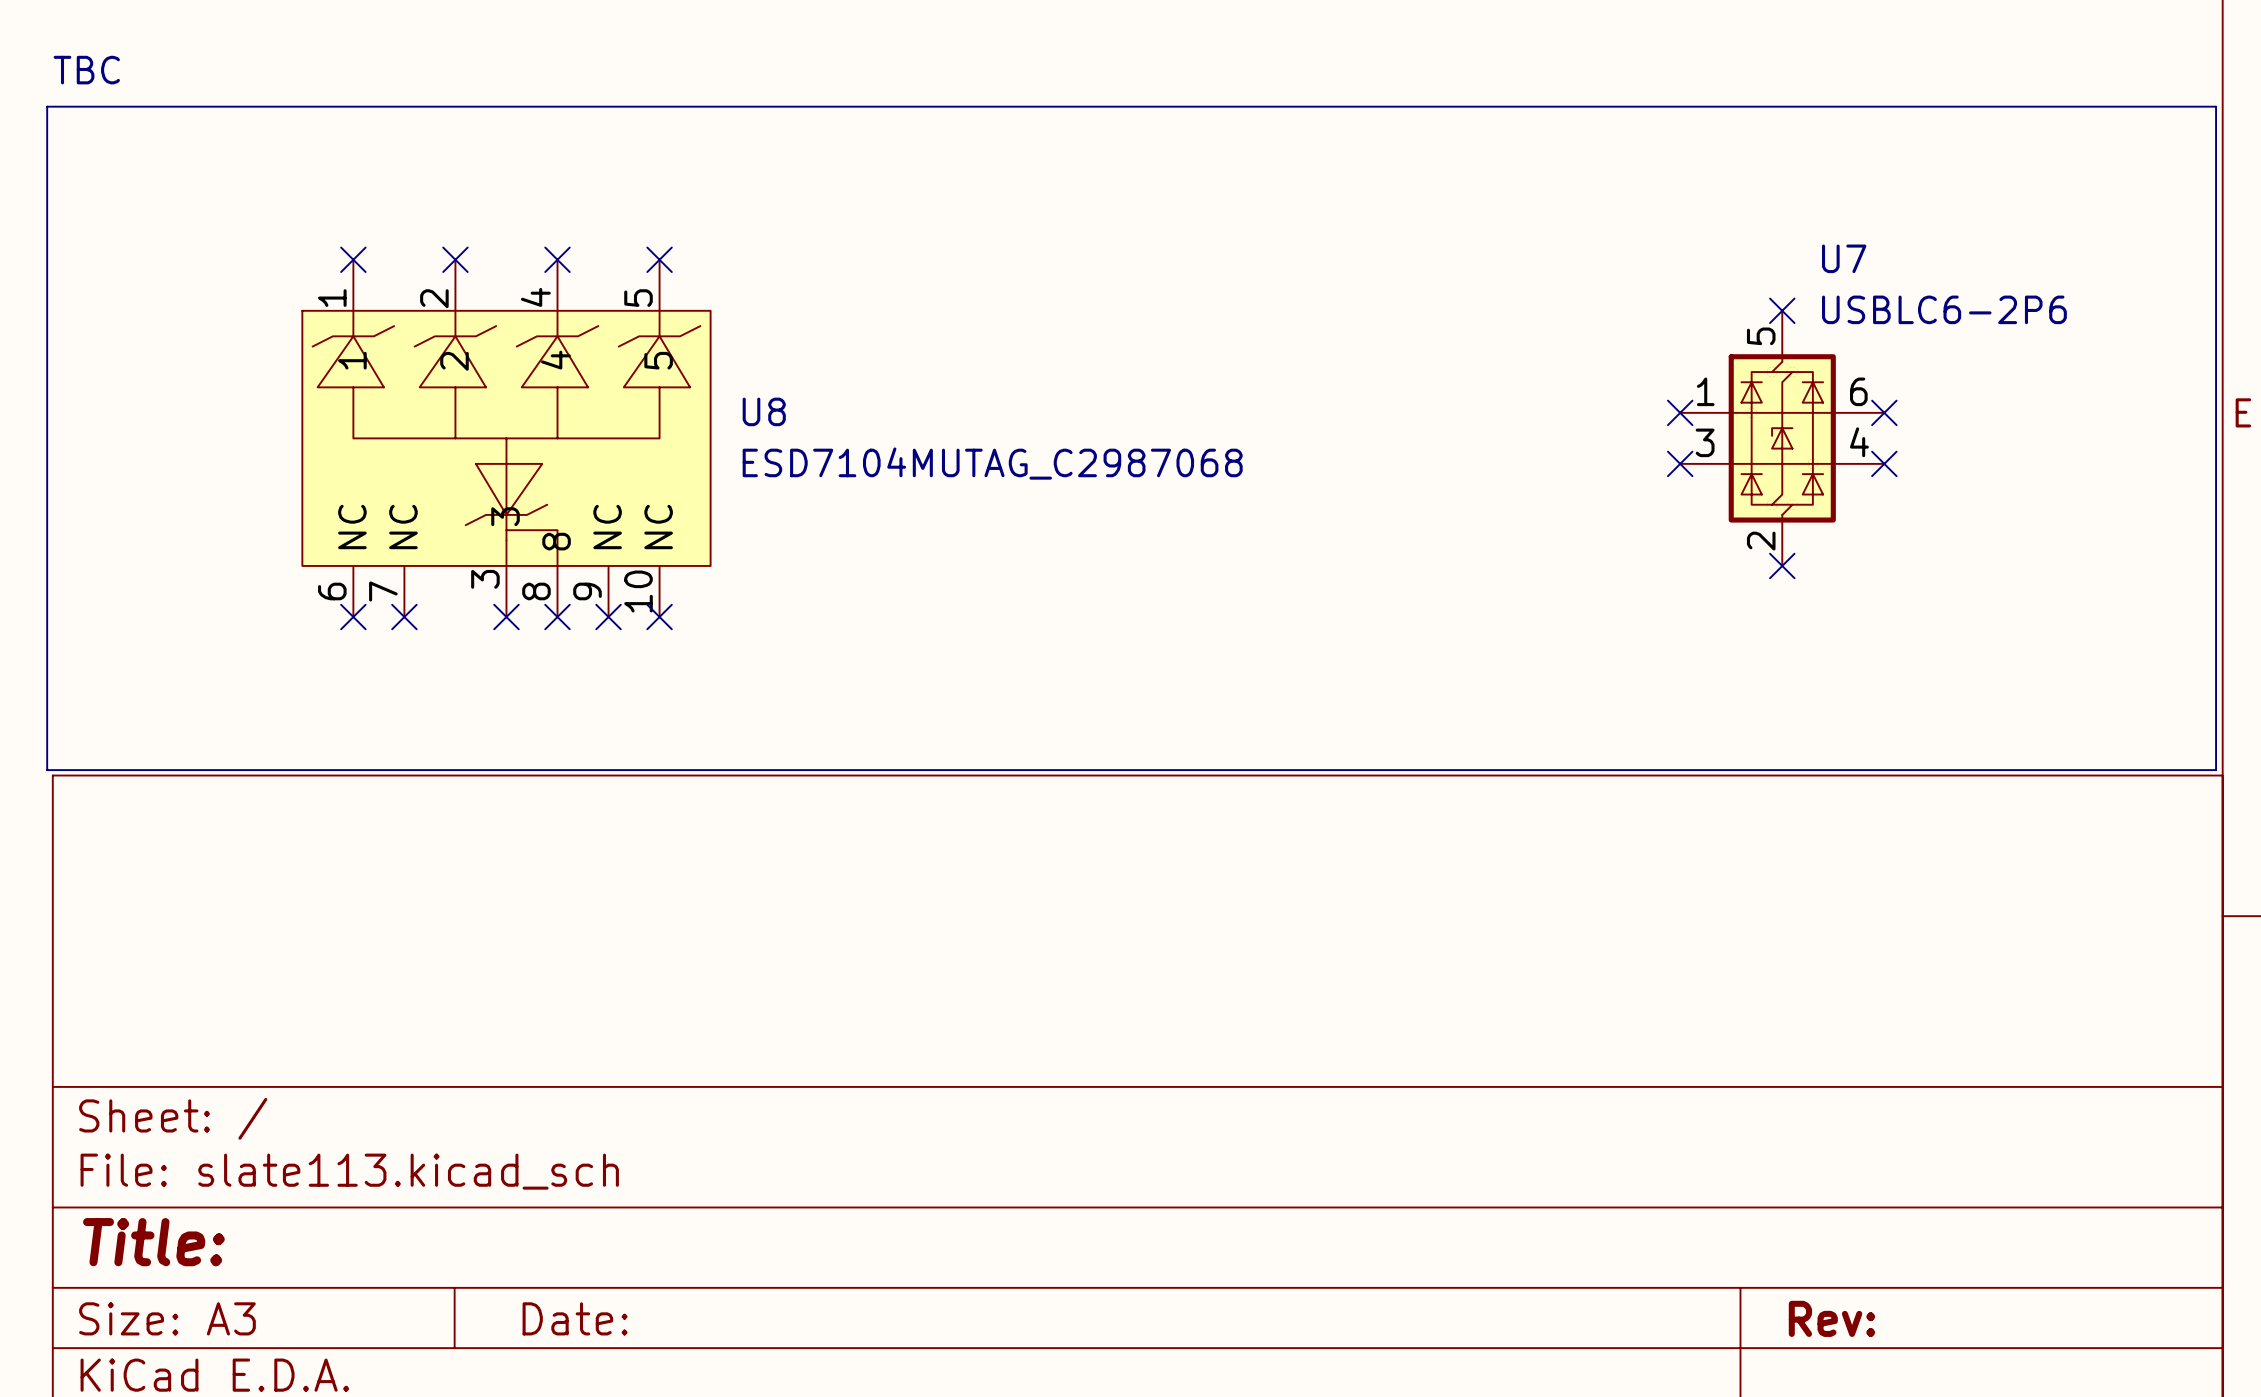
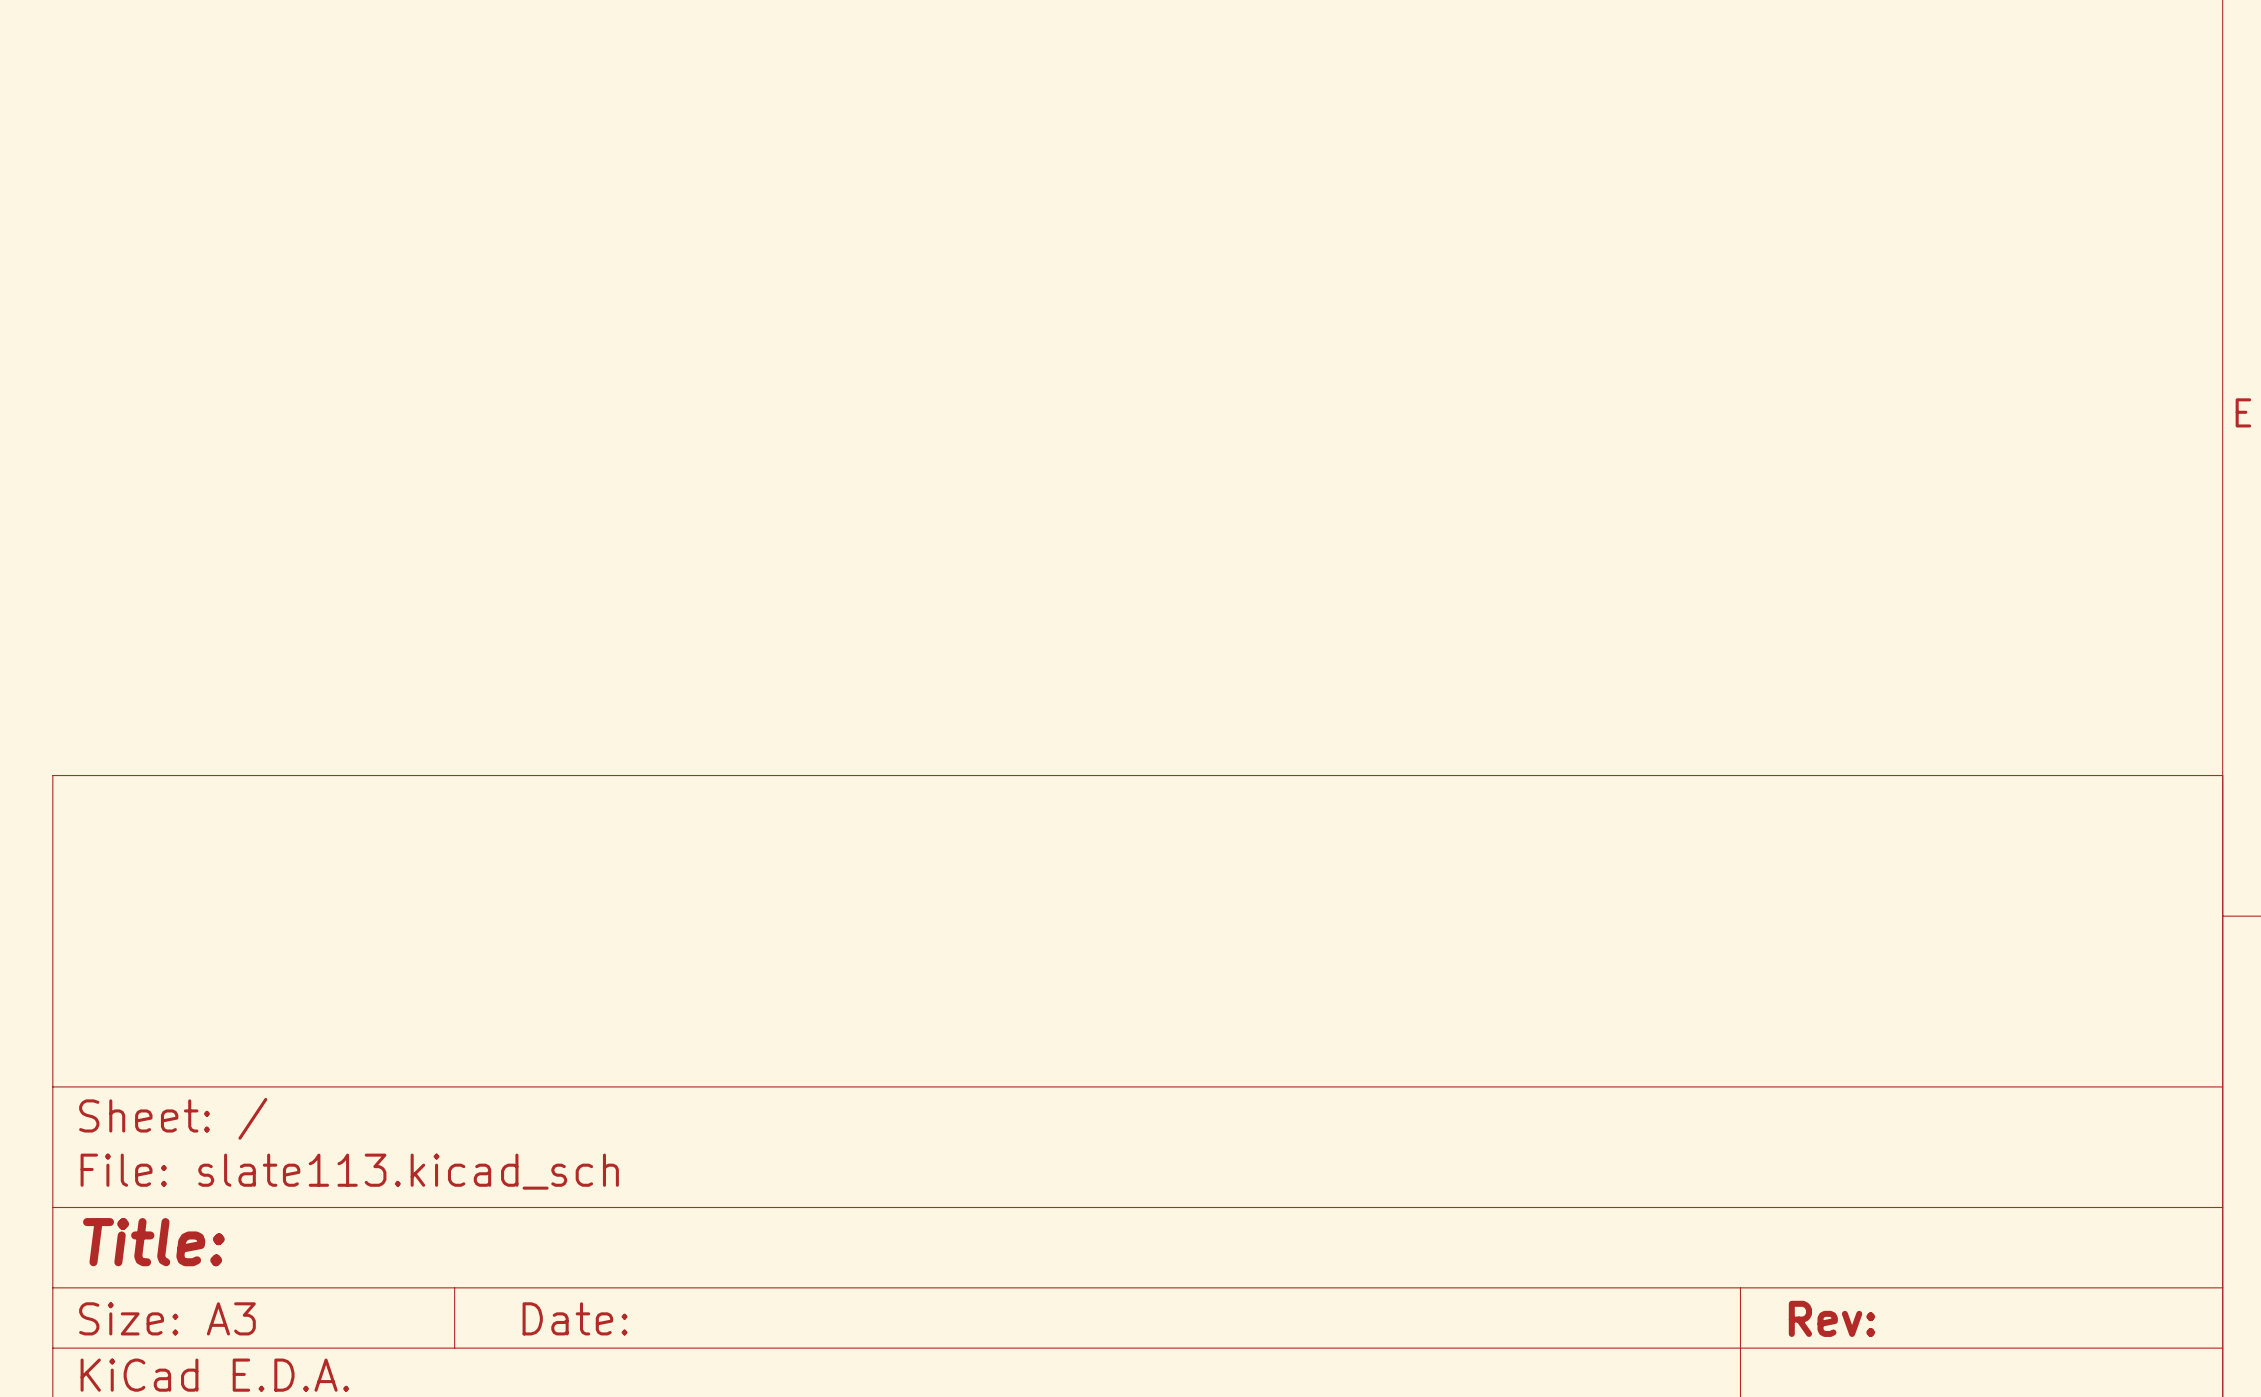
text: TBC (86, 70) -> none
line: (47, 106) (2216, 106) (2216, 770) (47, 770) (47, 106) -> none
no-connect mark: (353, 259) -> none
no-connect mark: (455, 259) -> none
no-connect mark: (557, 259) -> none
no-connect mark: (659, 259) -> none
no-connect mark: (1782, 310) -> none
no-connect mark: (1680, 412) -> none
no-connect mark: (1884, 412) -> none
U8: ESD7104MUTAG_C2987068 (506, 438) -> none
U7: USBLC6-2P6 (1782, 438) -> none
no-connect mark: (1680, 463) -> none
no-connect mark: (1884, 463) -> none
no-connect mark: (1782, 565) -> none
no-connect mark: (353, 617) -> none
no-connect mark: (404, 617) -> none
no-connect mark: (506, 617) -> none
no-connect mark: (557, 617) -> none
no-connect mark: (608, 617) -> none
no-connect mark: (659, 617) -> none

